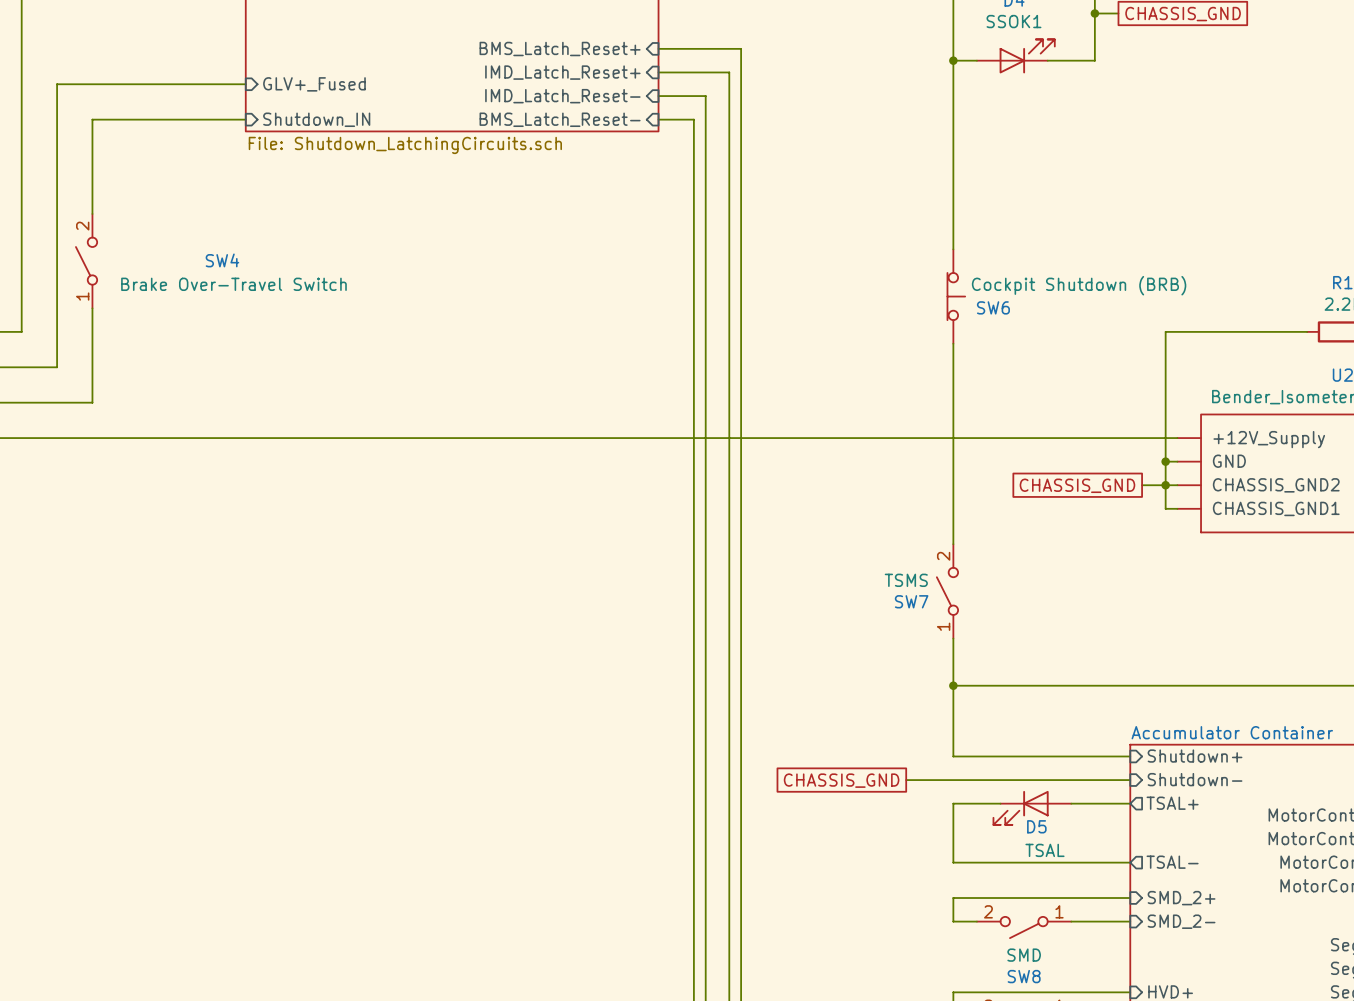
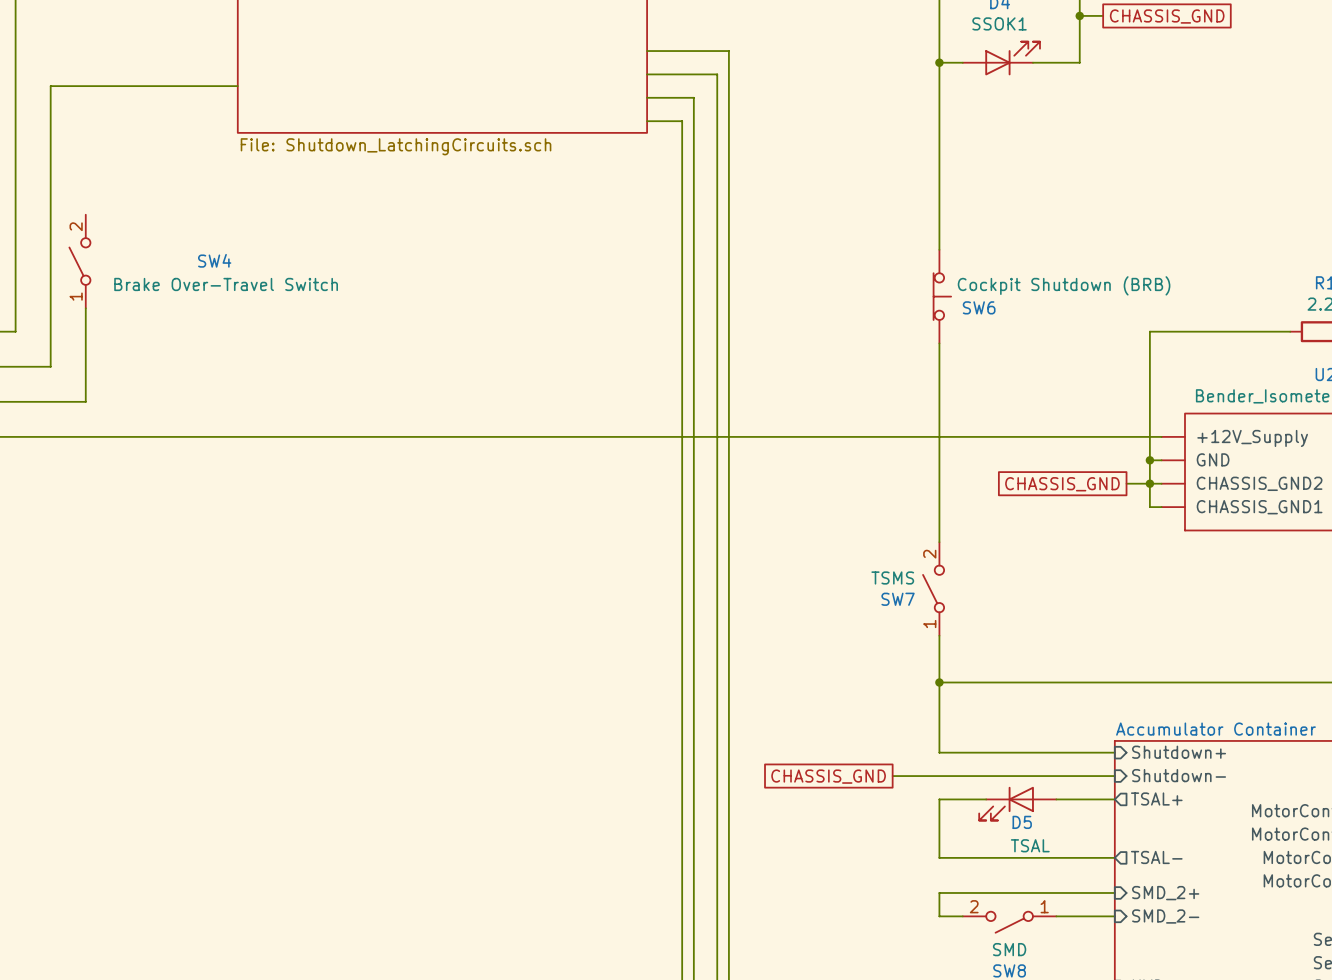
sheet pin: BMS_Latch_Reset+ (560, 49) -> none
sheet pin: IMD_Latch_Reset+ (562, 72) -> none
sheet pin: GLV+_Fused (314, 84) -> none
sheet pin: IMD_Latch_Reset- (562, 96) -> none
wire: (245, 119) (92, 119) (92, 213) -> none
sheet pin: Shutdown_IN (316, 119) -> none
sheet pin: BMS_Latch_Reset- (560, 119) -> none

